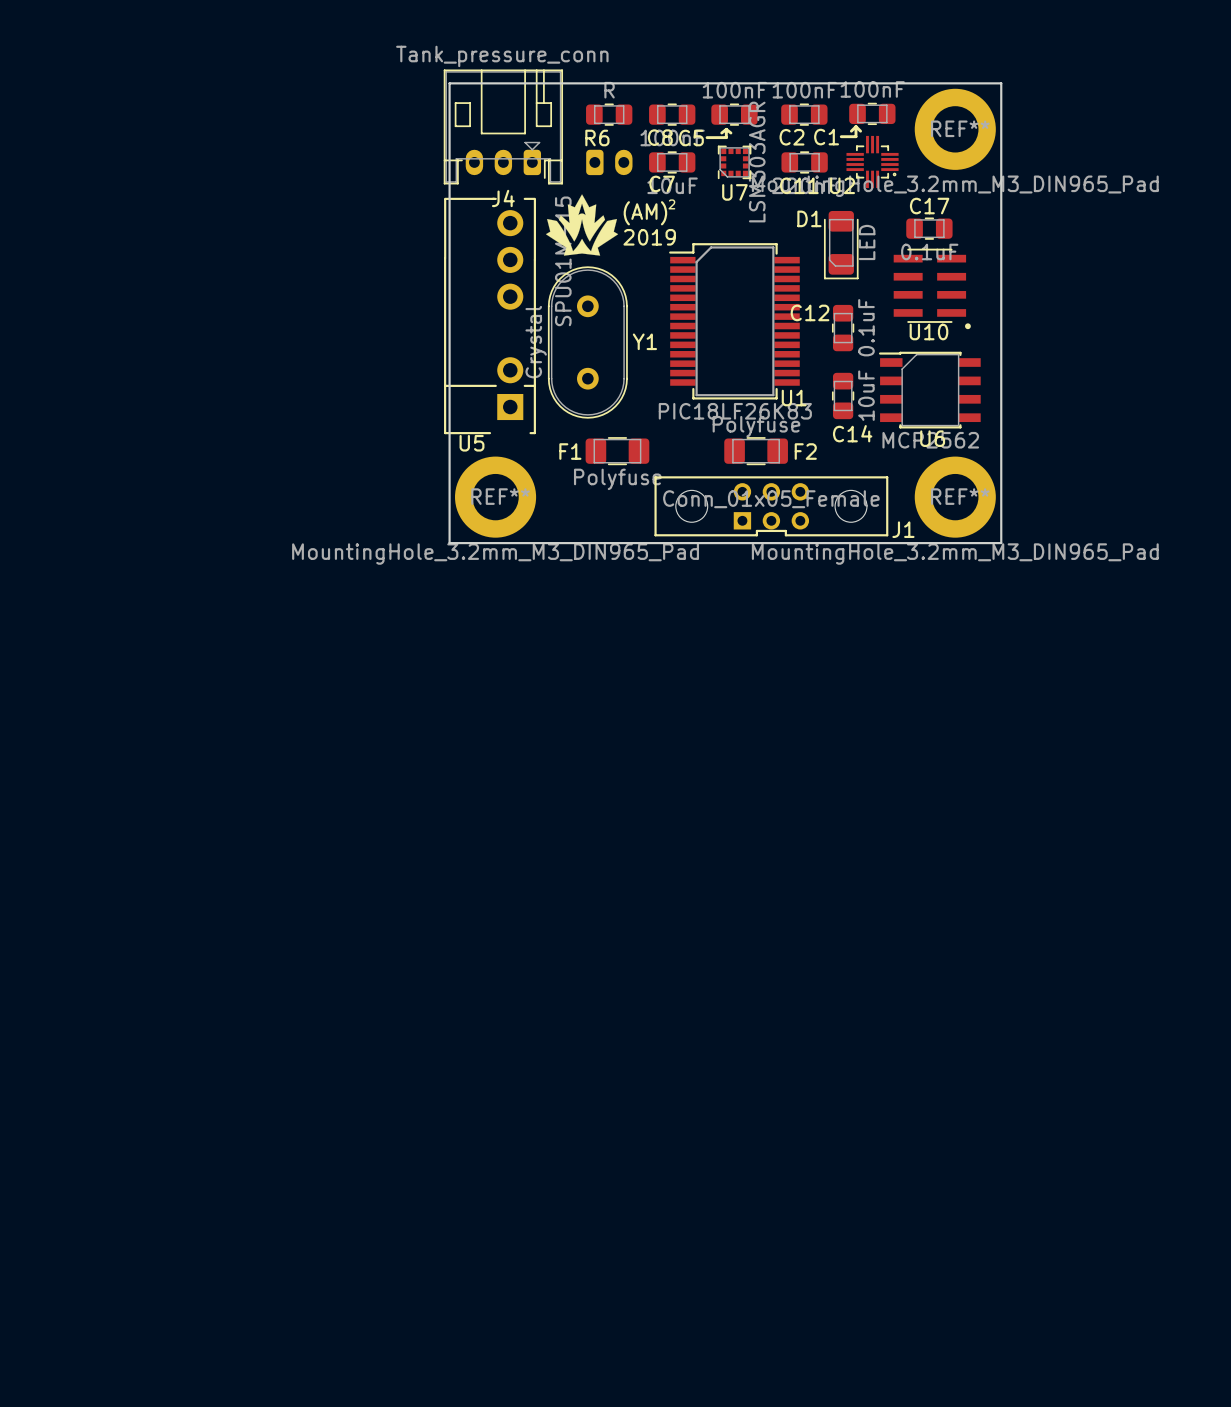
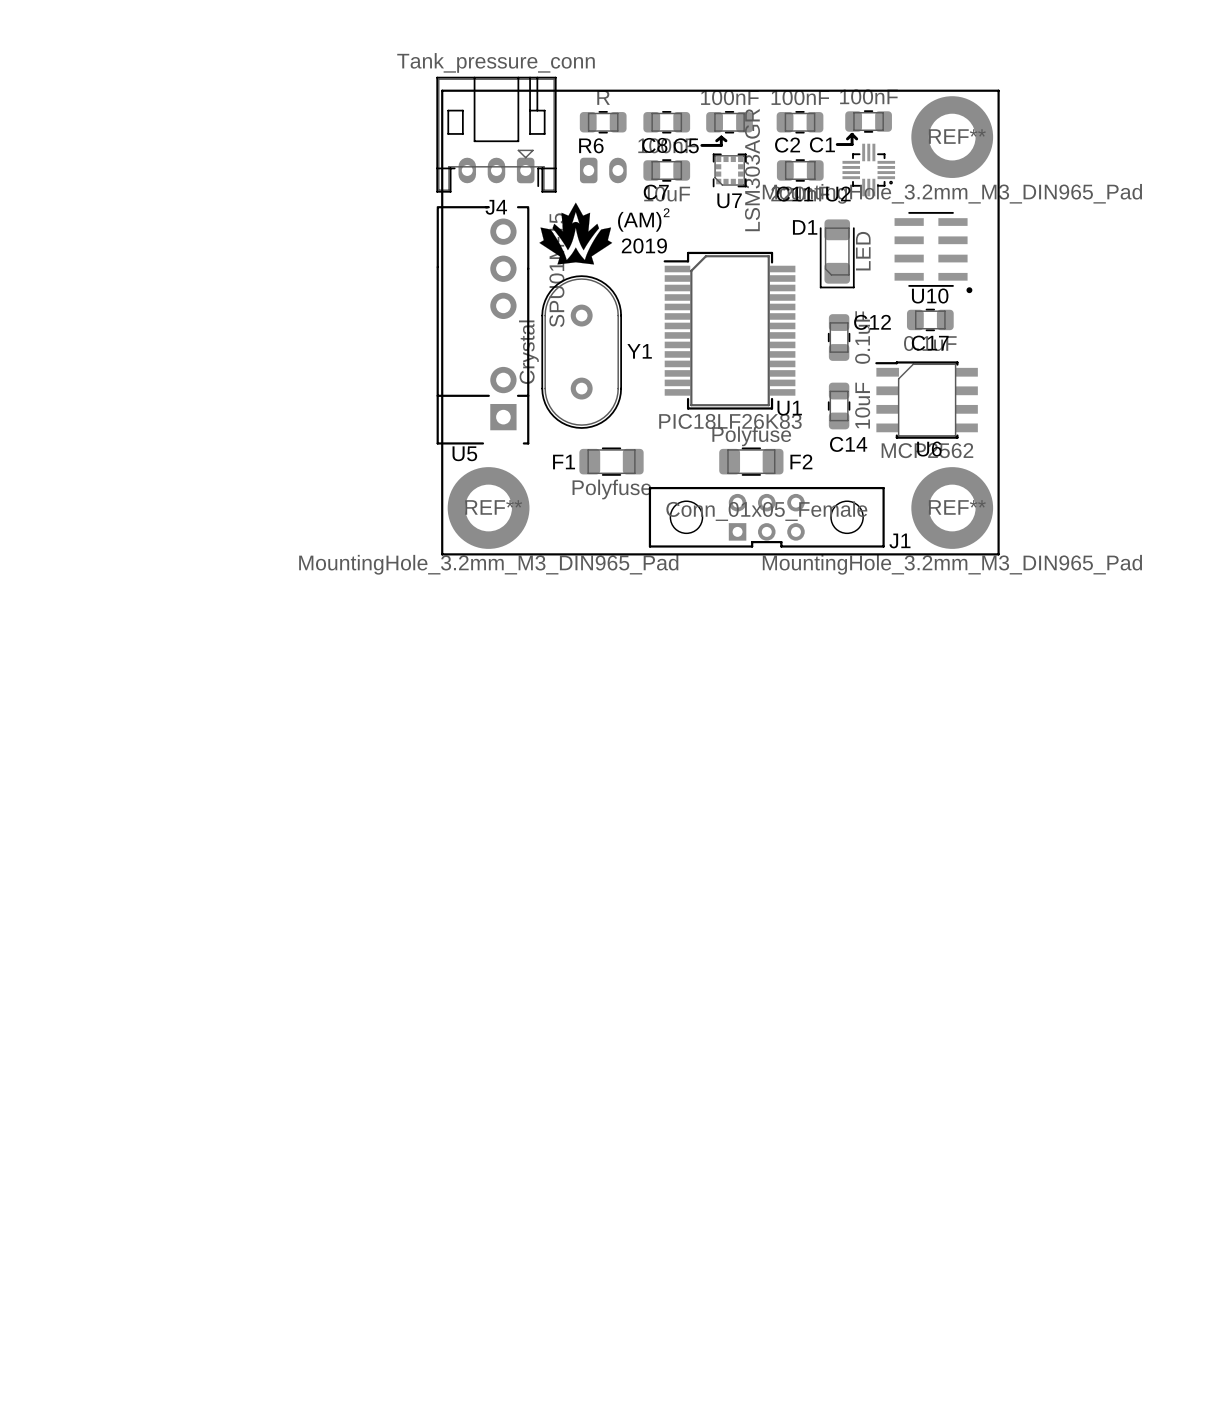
C17 name position: C17 (929, 206) -> C17 (930, 343)
C17 position: (929, 228) -> (930, 319)
U10 position: (932, 288) -> (933, 252)
C12 name position: C12 (810, 312) -> C12 (872, 322)

